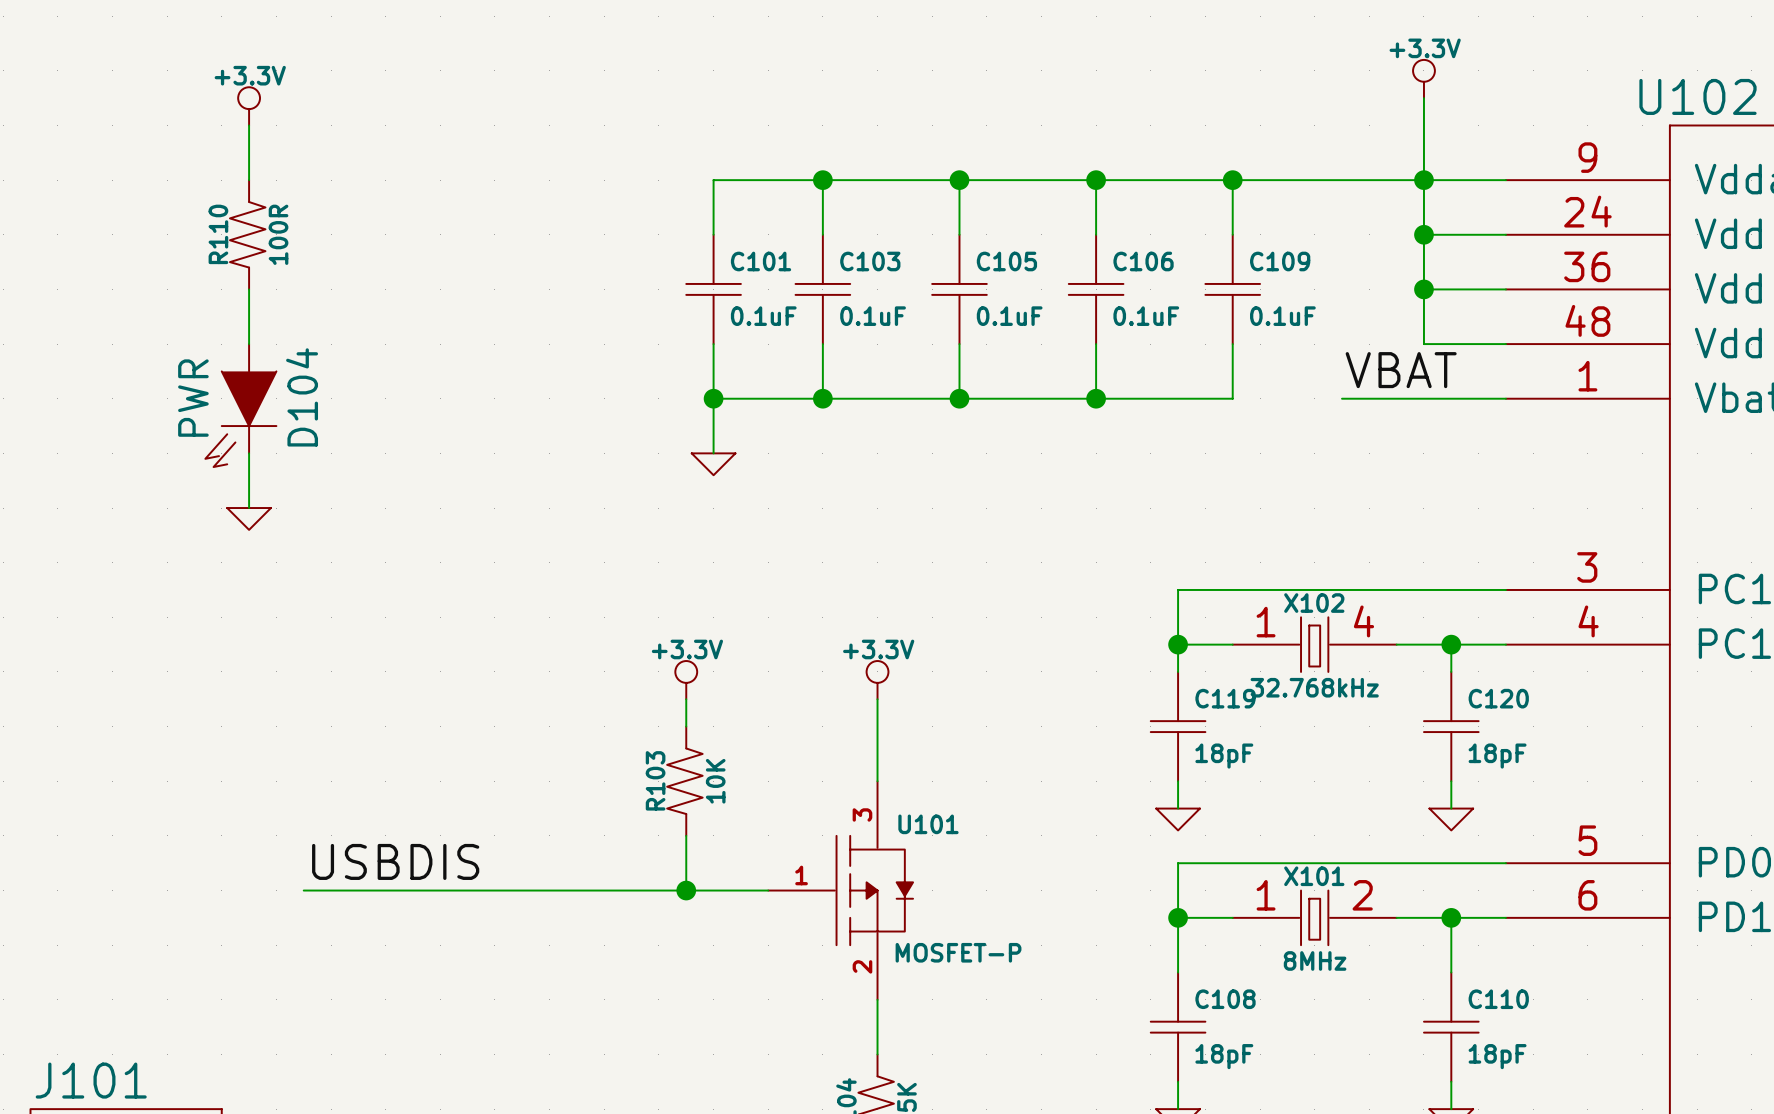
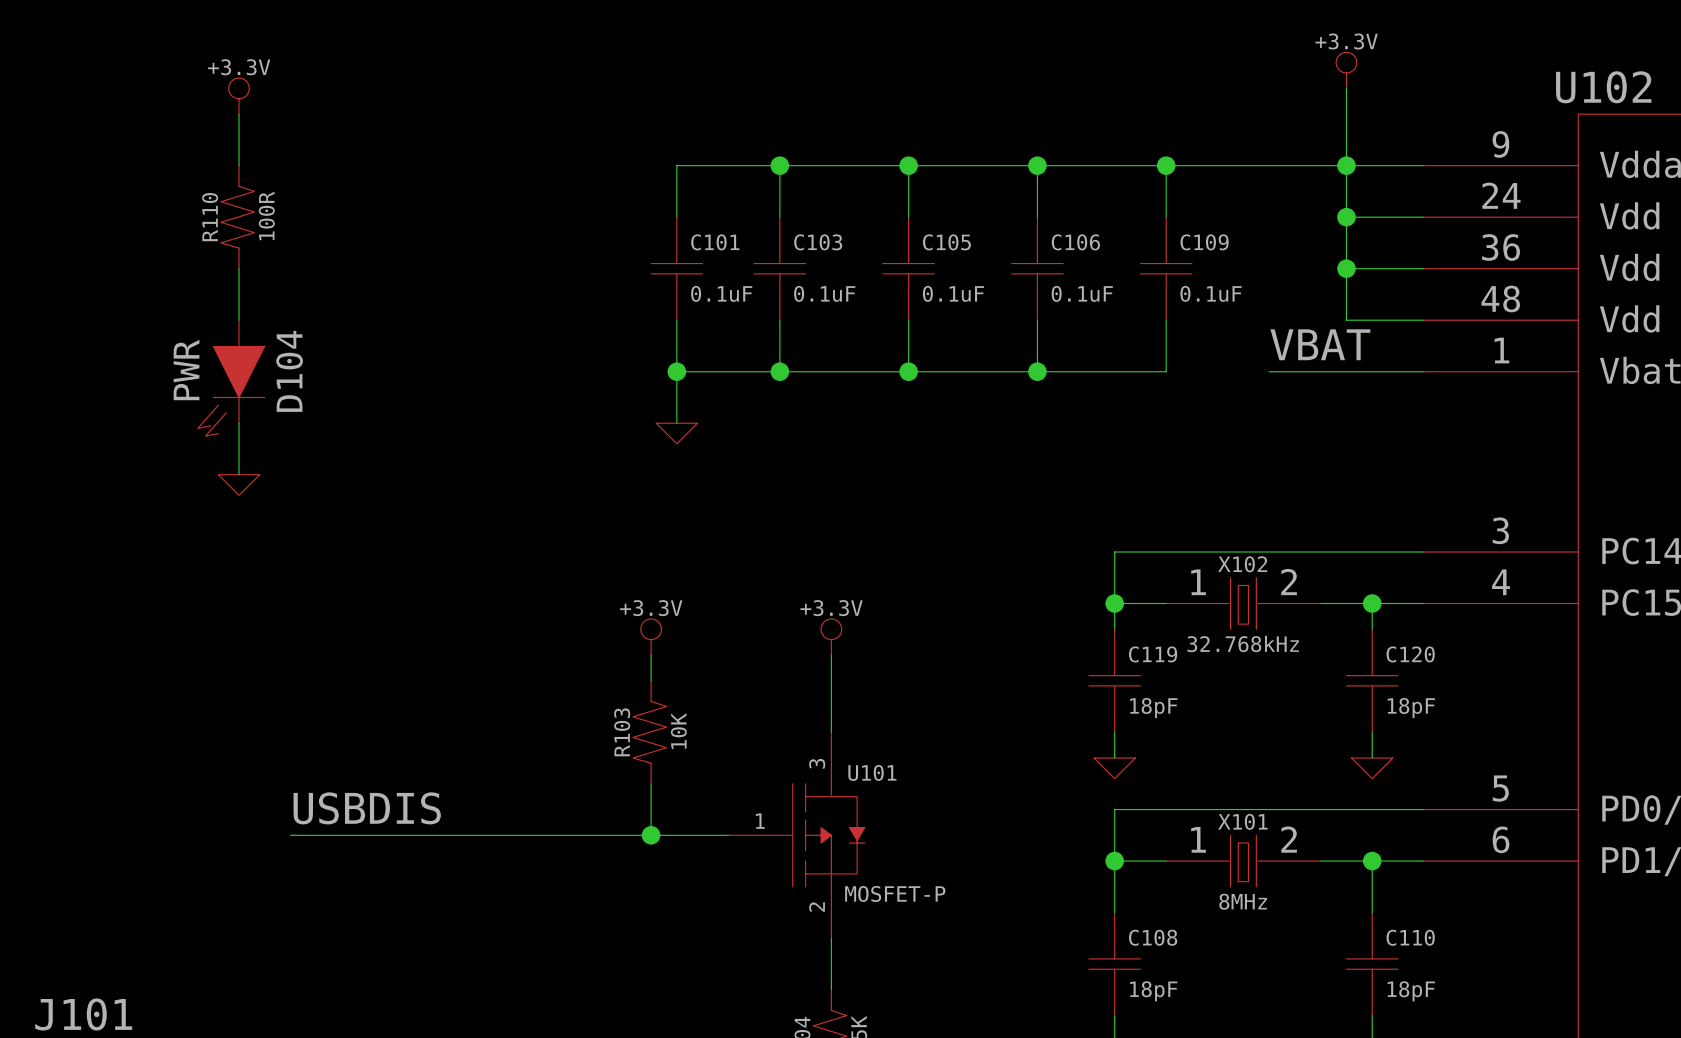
X102 pin number: 4 (1363, 621) -> 2 (1289, 582)

